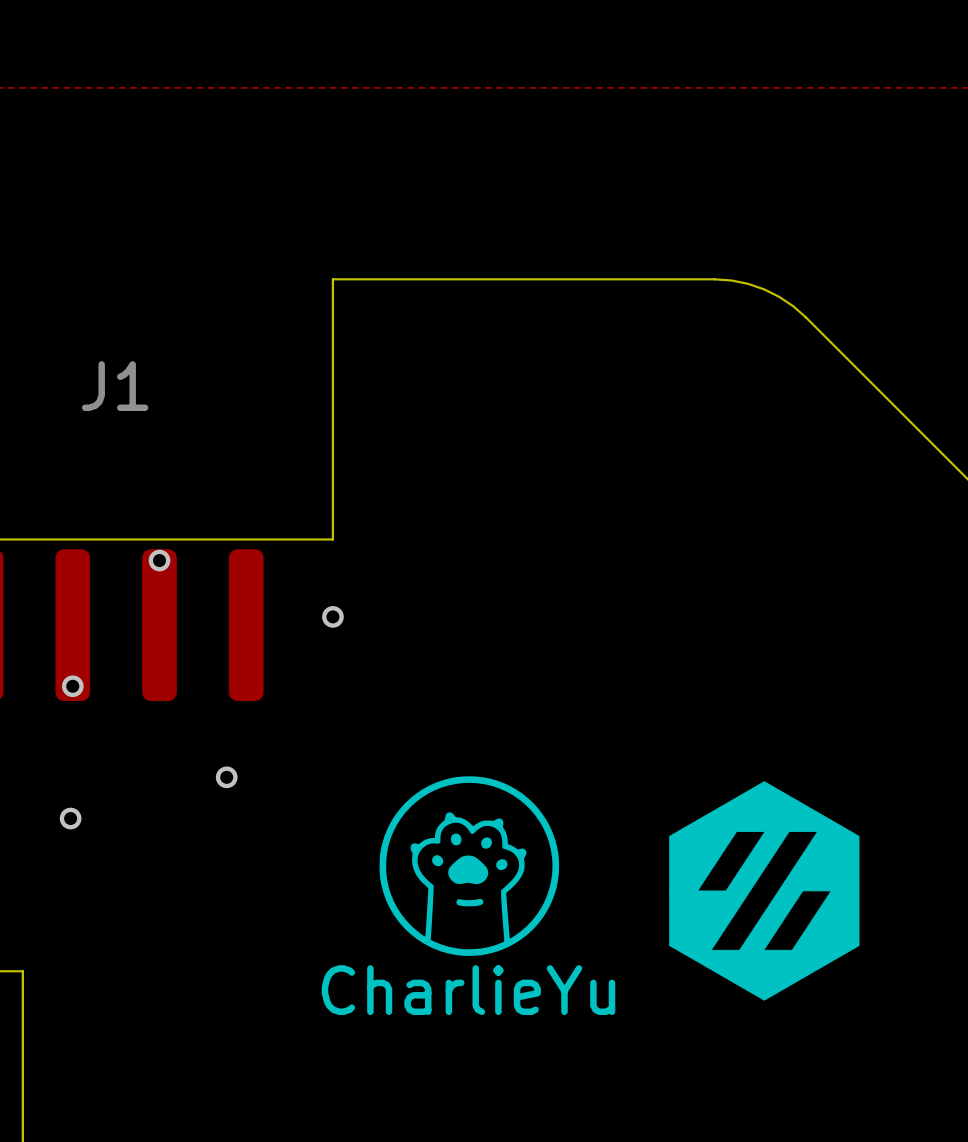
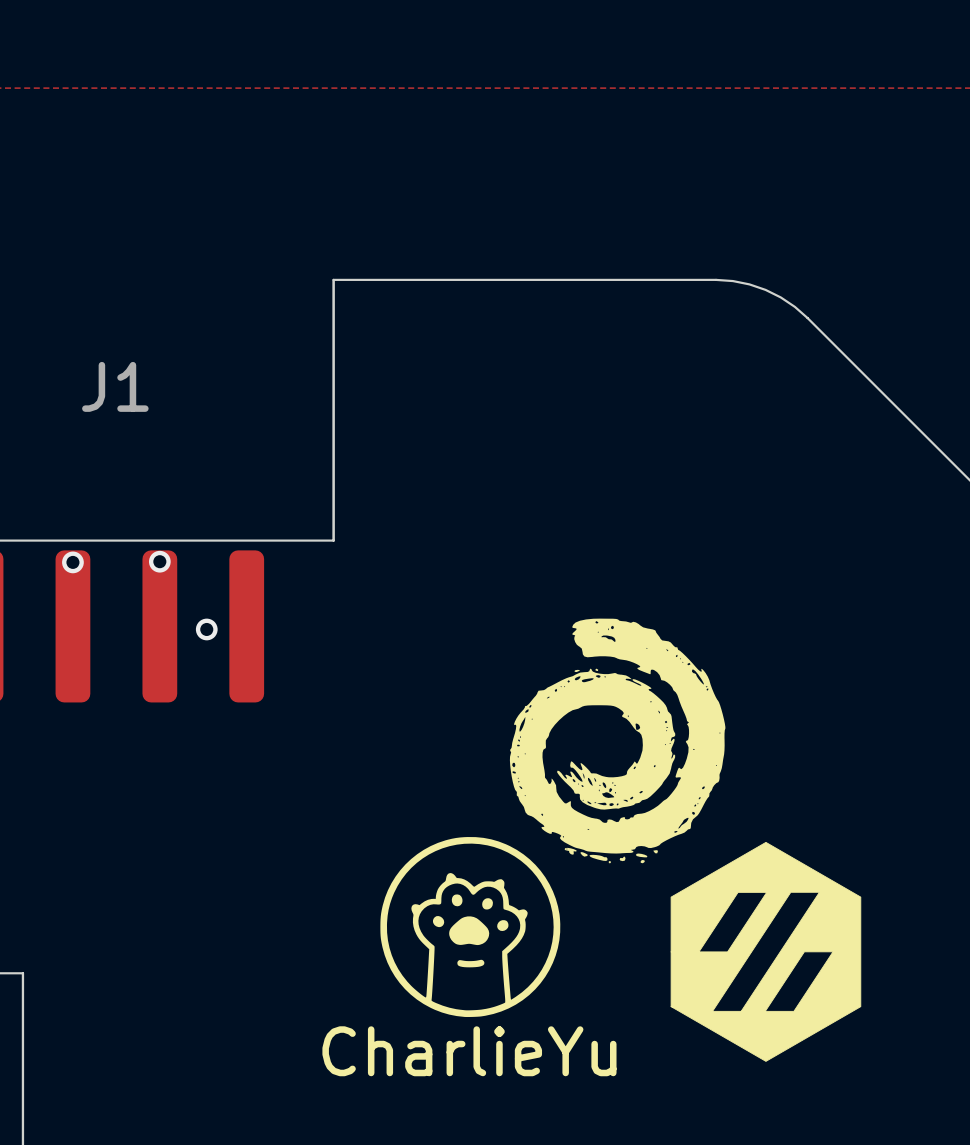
via: none -> (72, 562)
via: (332, 616) -> none
drawing: none -> [509, 618, 726, 864]
via: none -> (206, 629)
via: (72, 686) -> none
via: (226, 777) -> none
via: (70, 818) -> none
drawing position: (469, 866) -> (470, 927)
drawing position: (764, 890) -> (765, 951)

